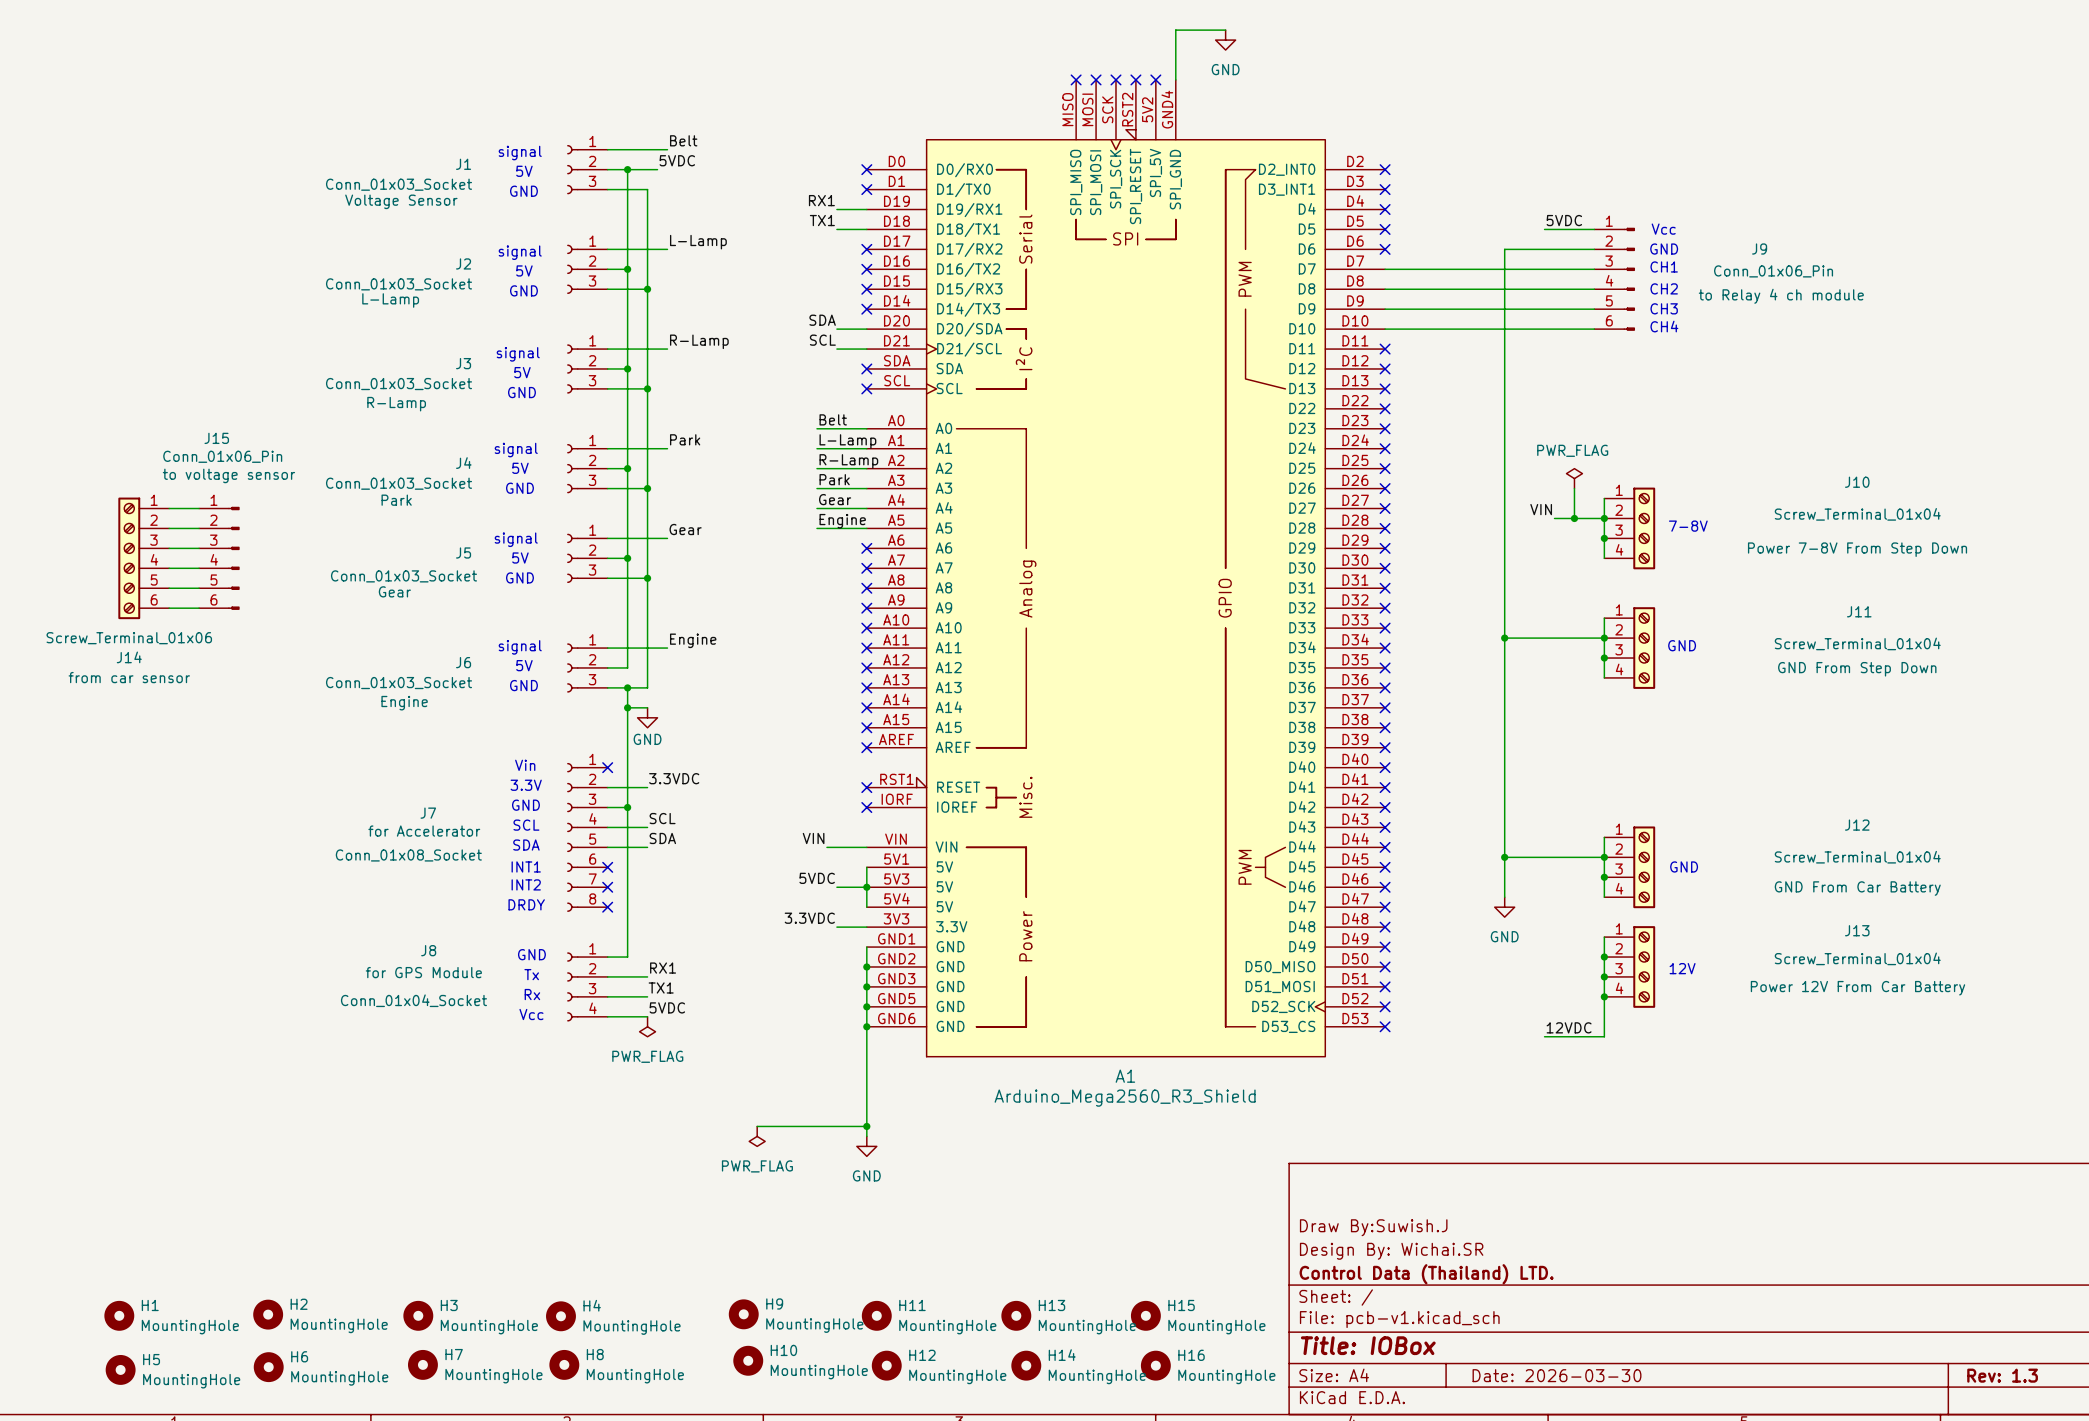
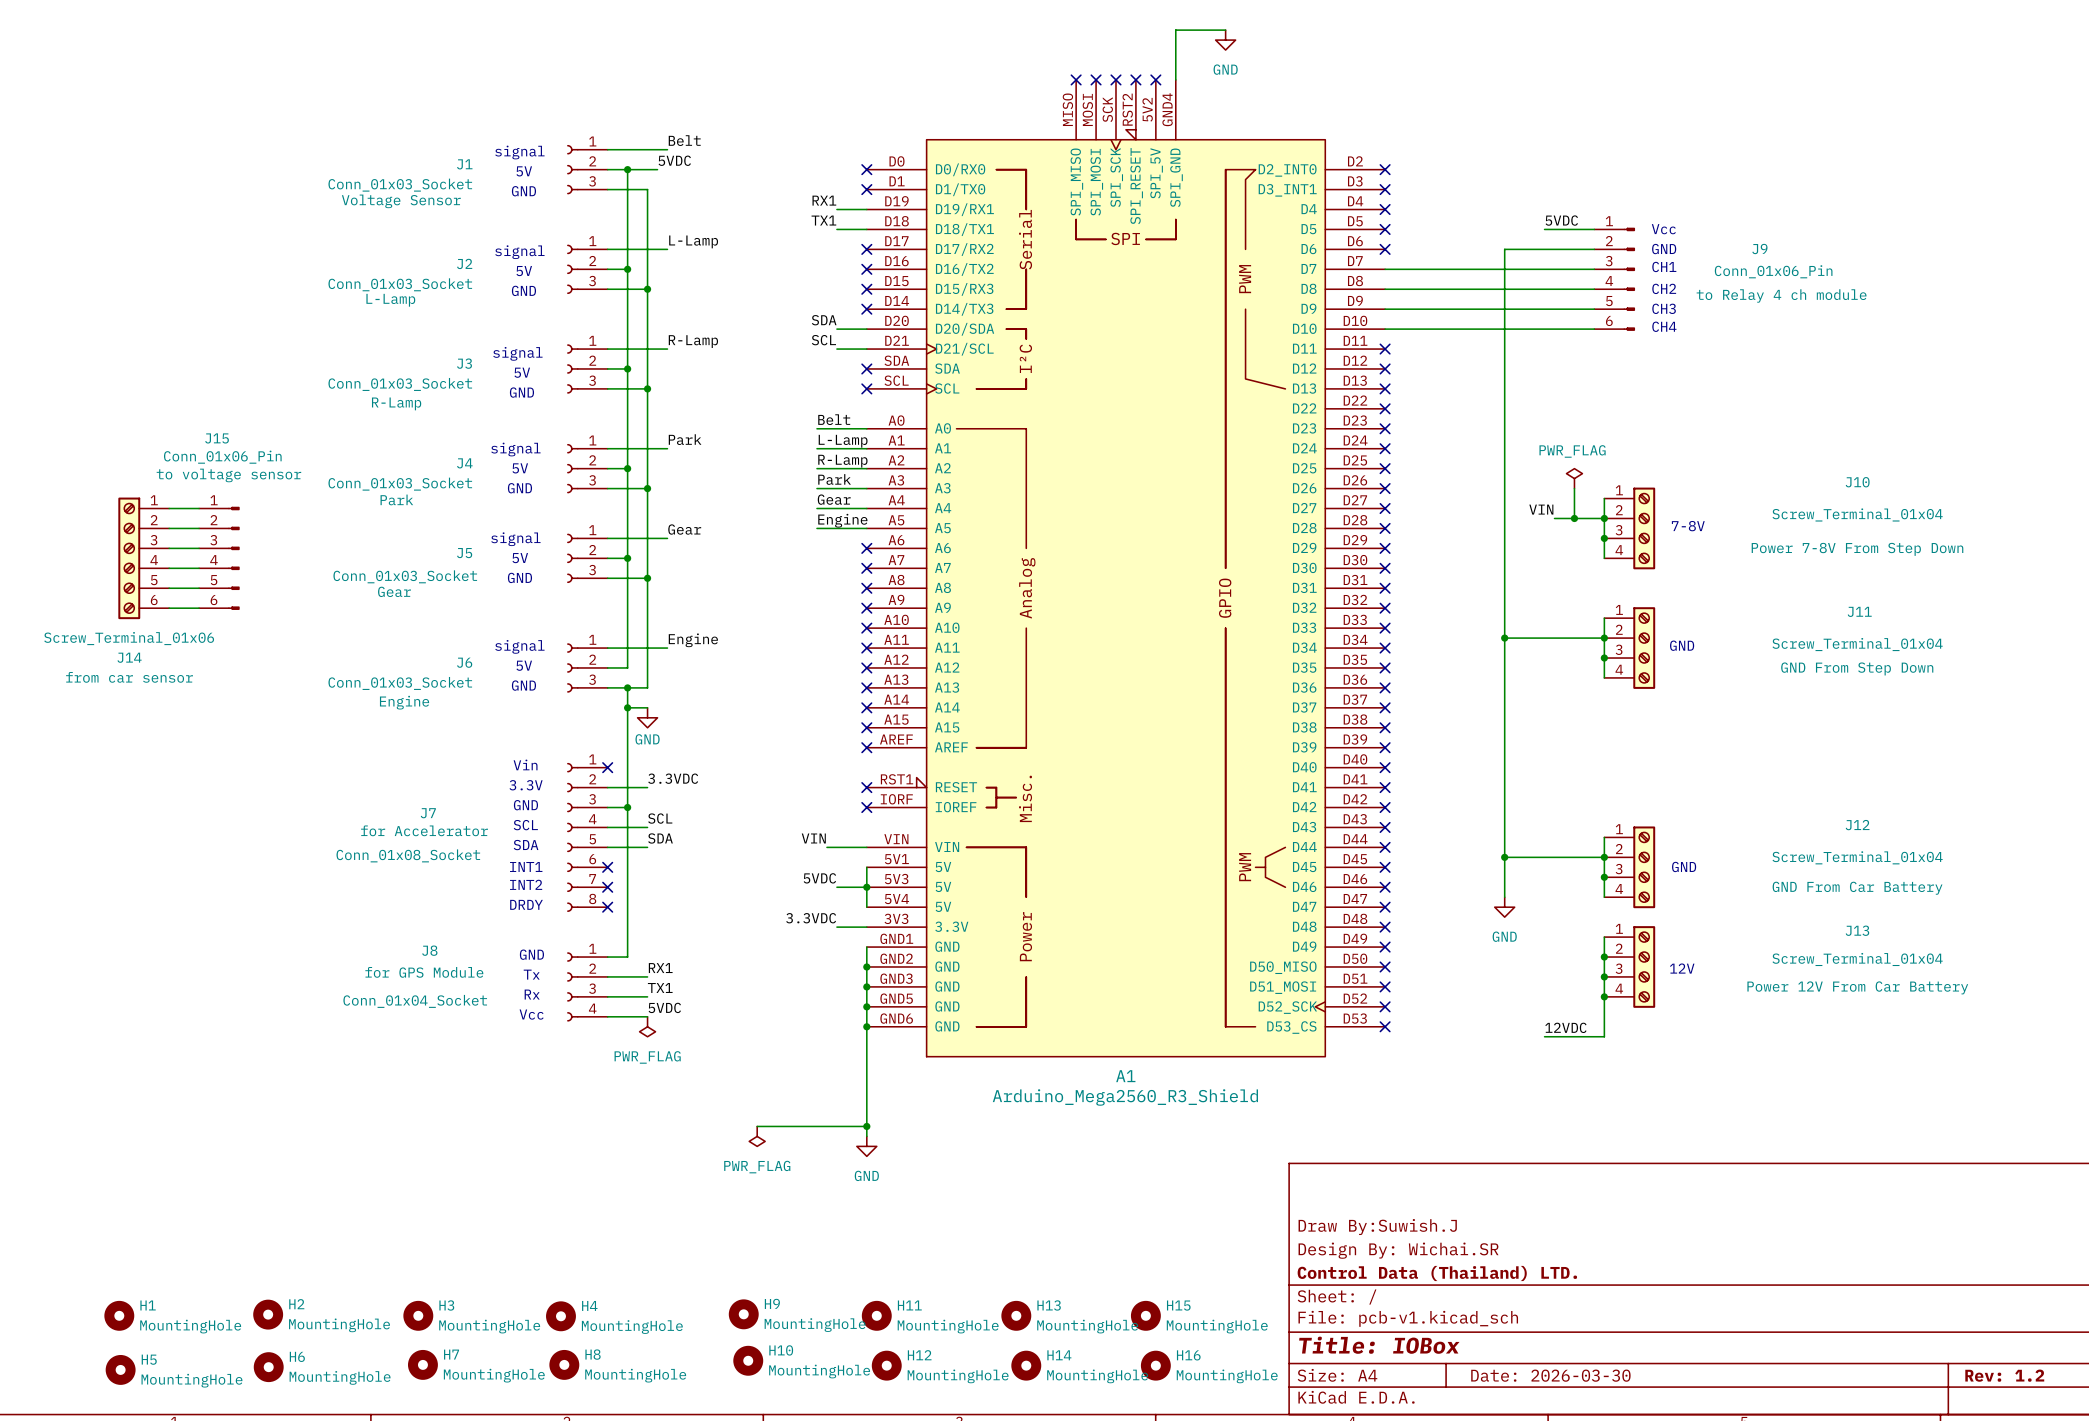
title block: Rev: 1.3 (2002, 1375) -> Rev: 1.2 (2004, 1375)

